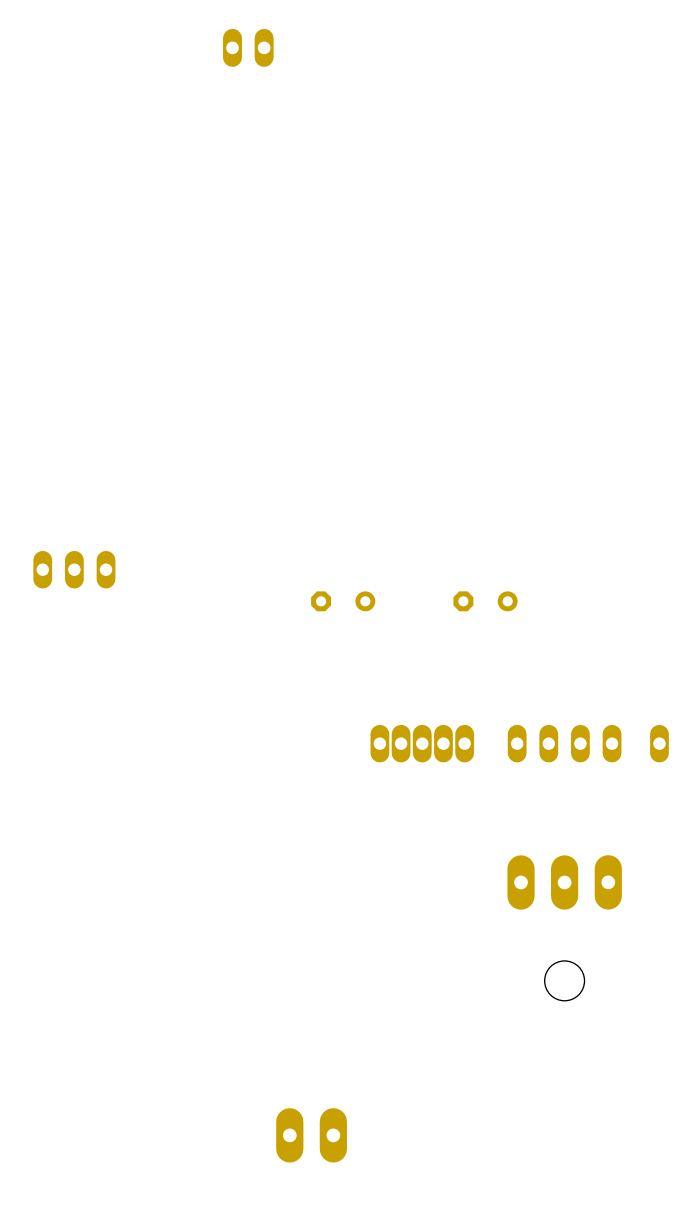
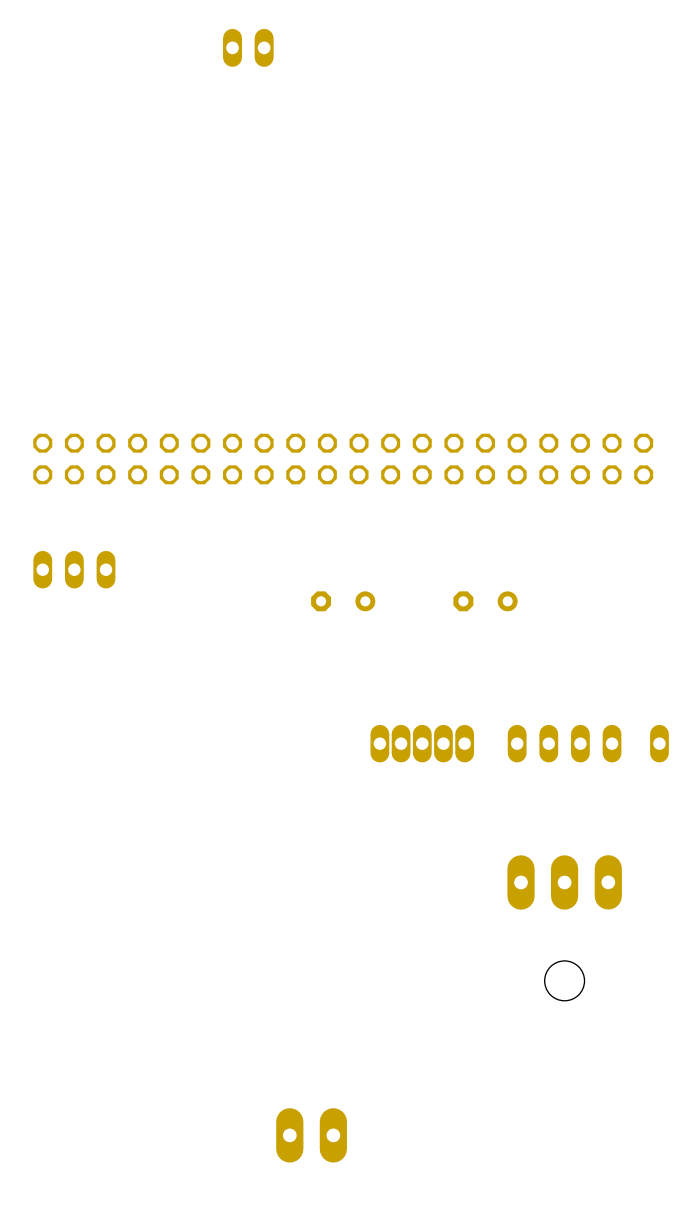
part: none -> (343, 459)

